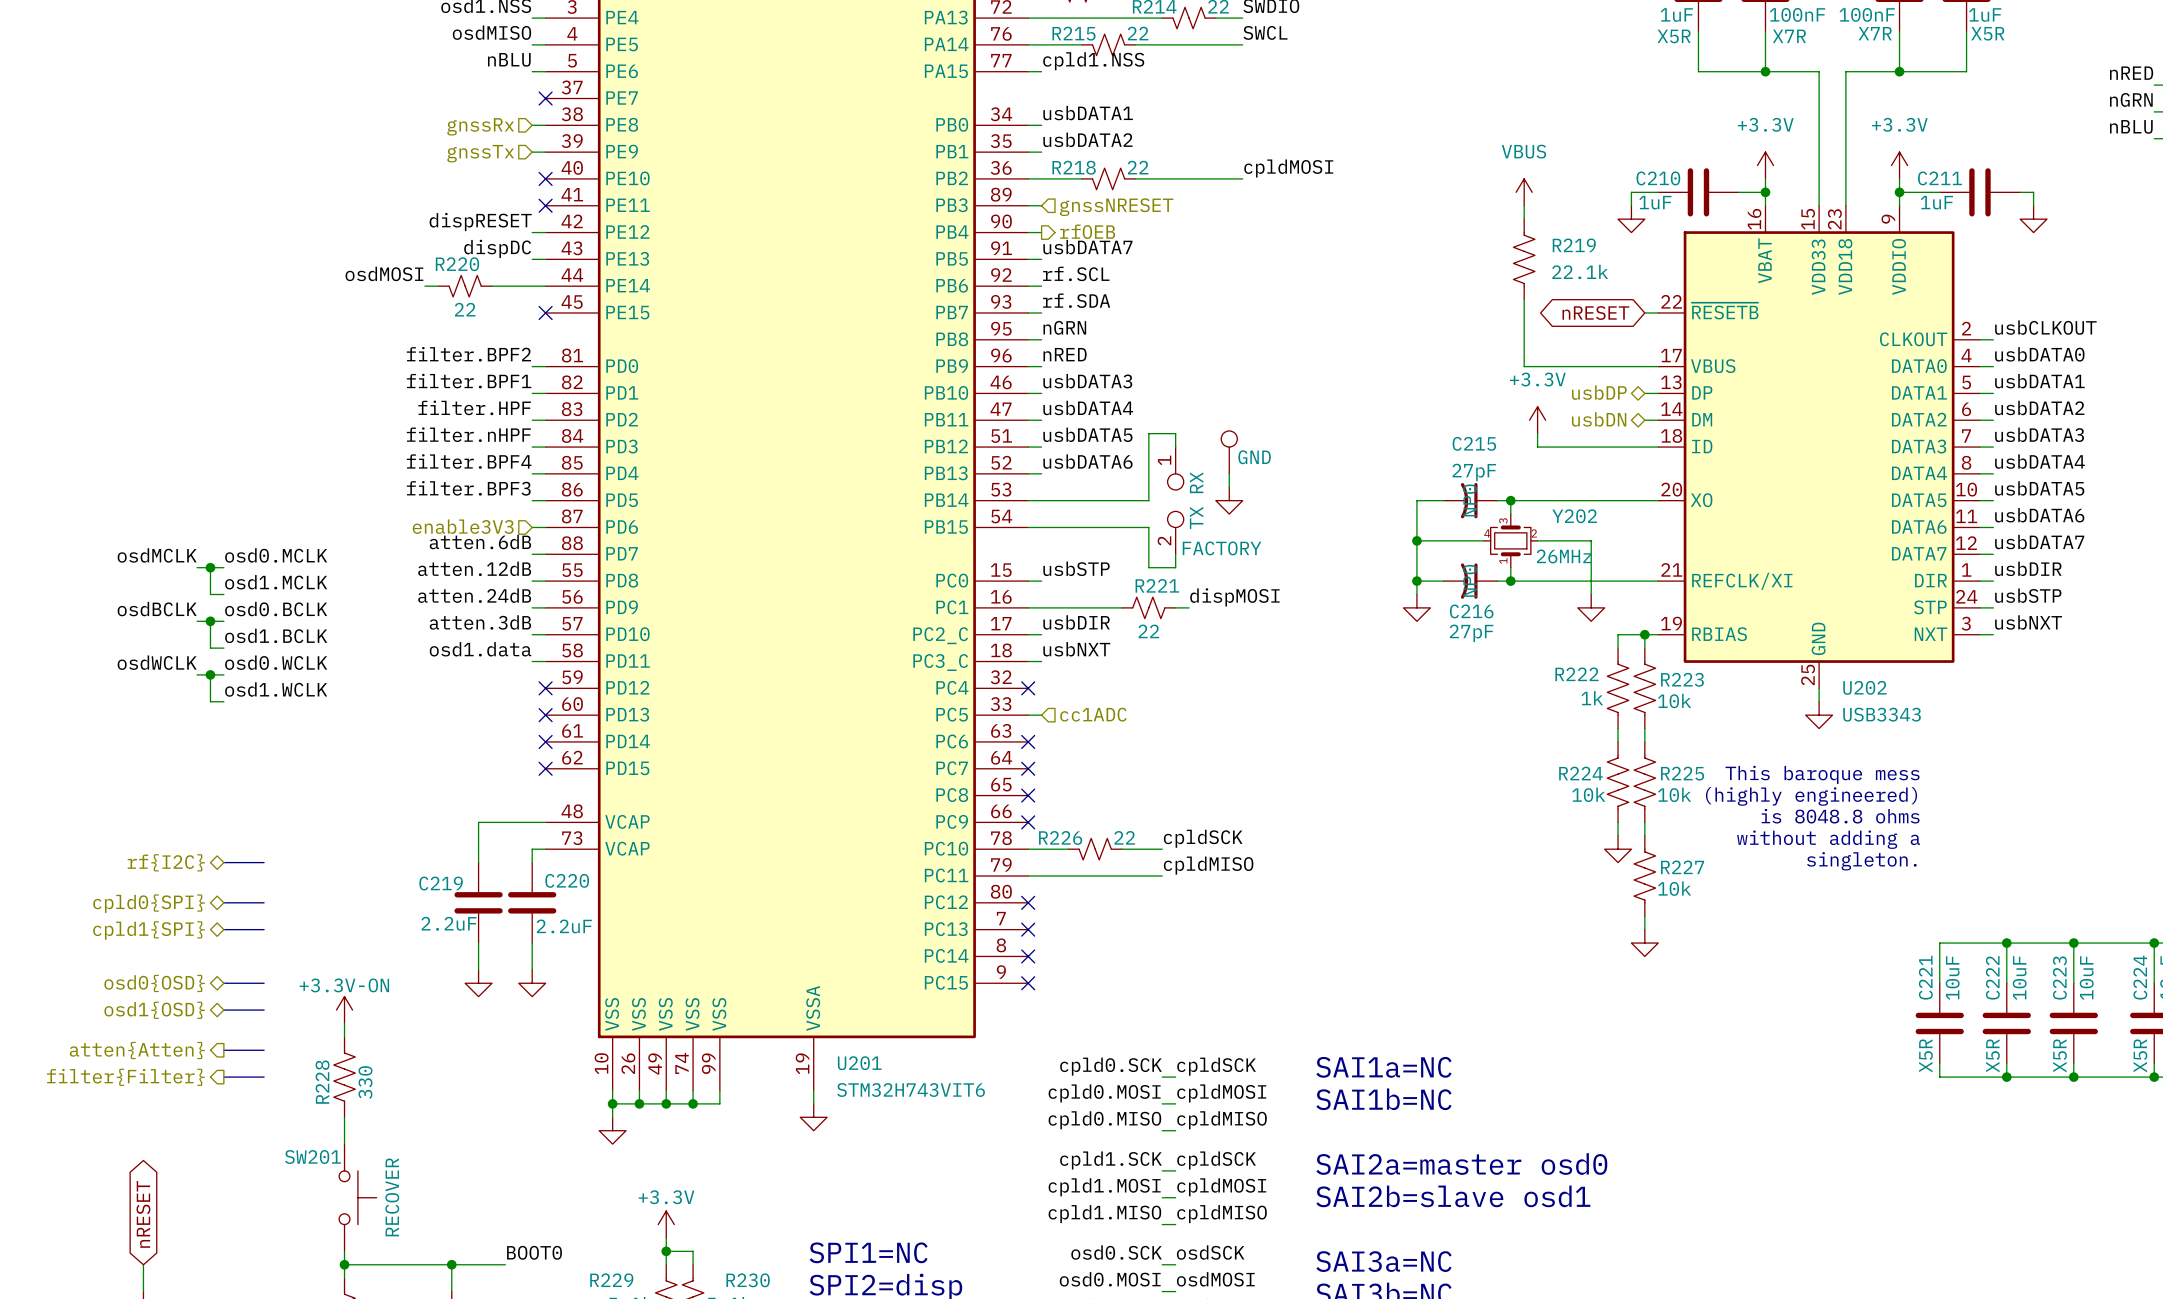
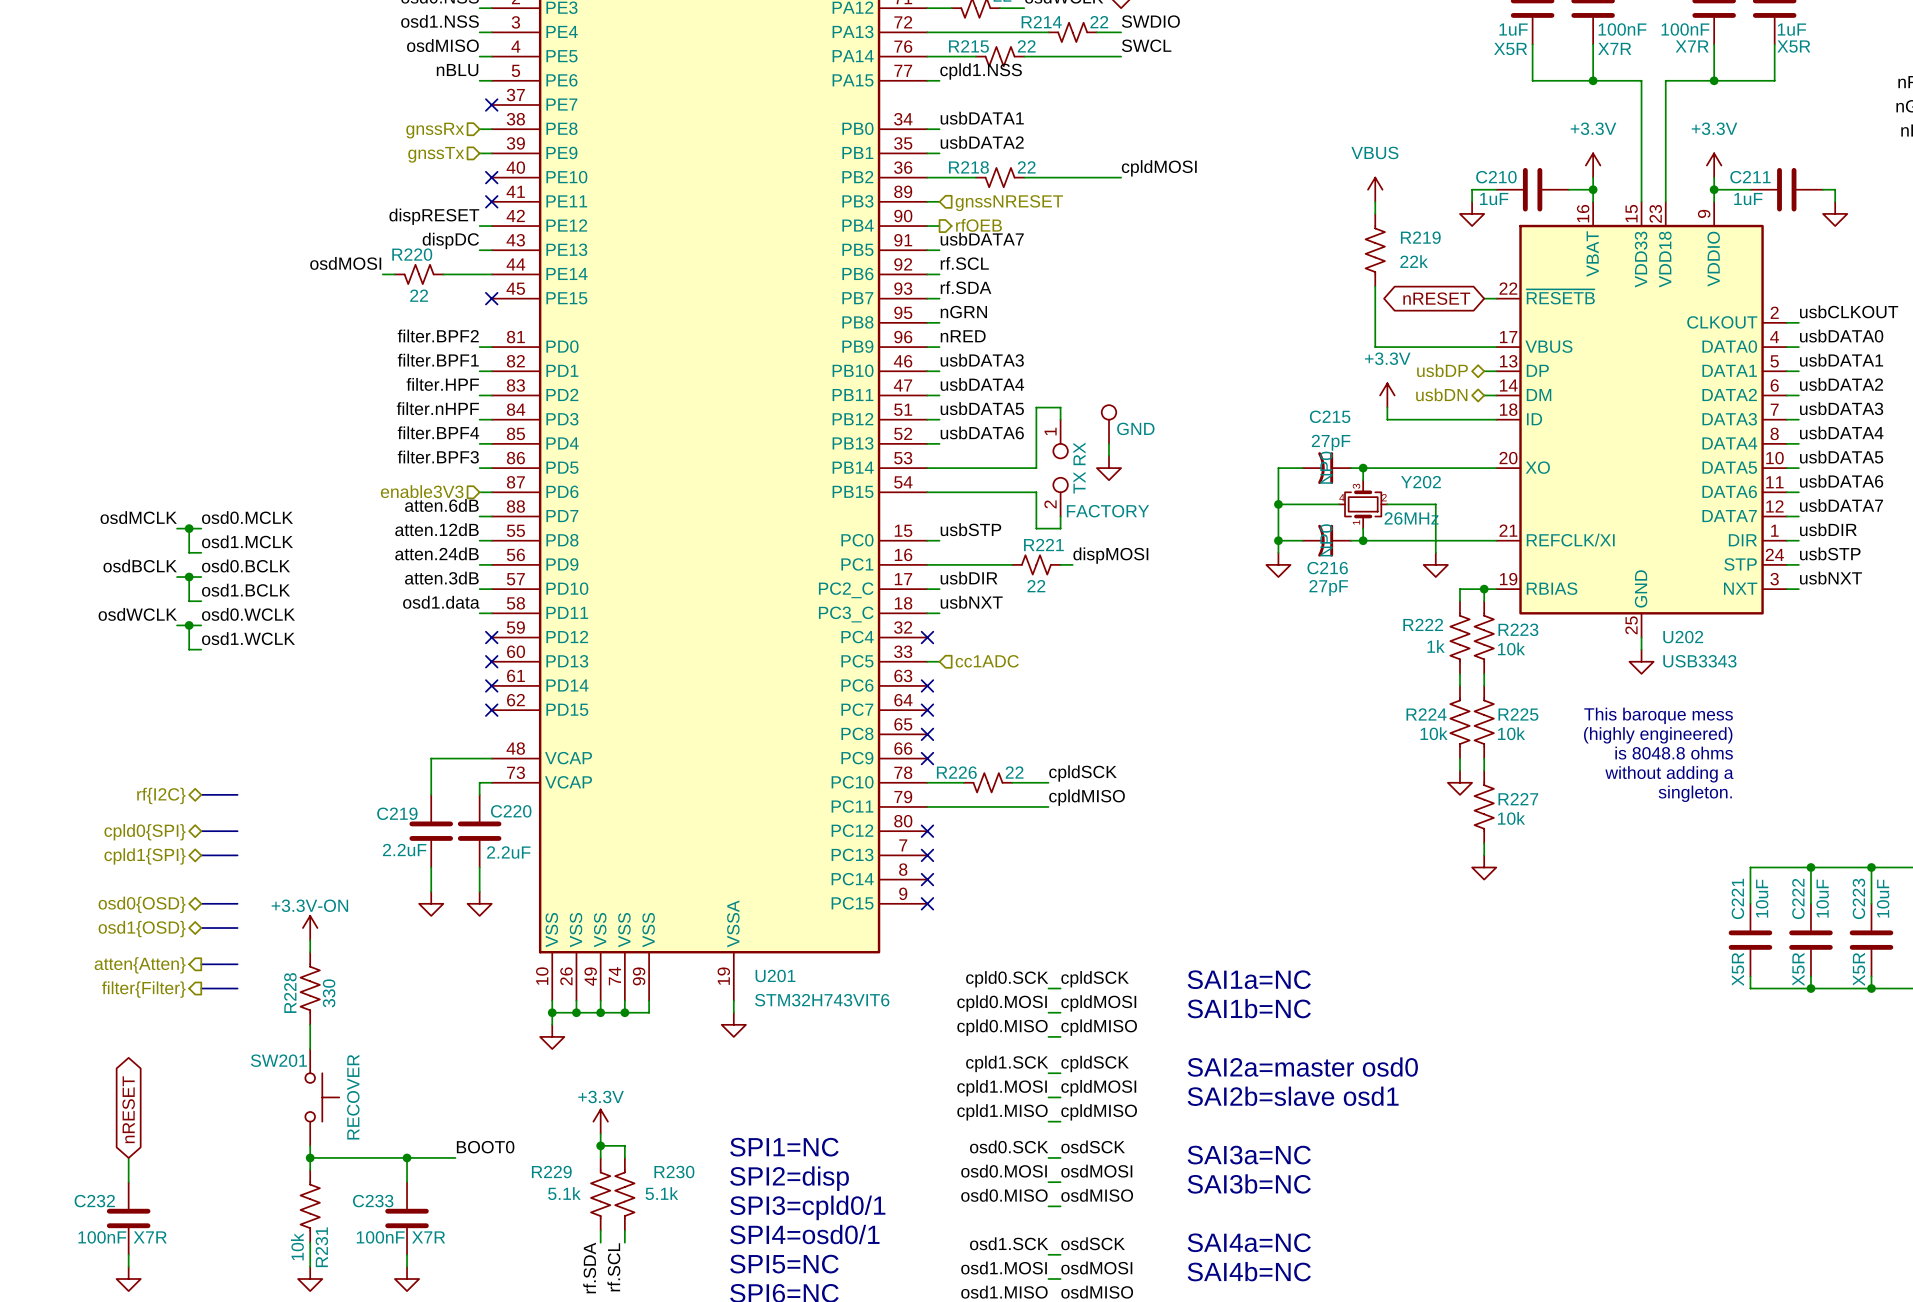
R219 value: 22.1k (1580, 271) -> 22k (1414, 261)

